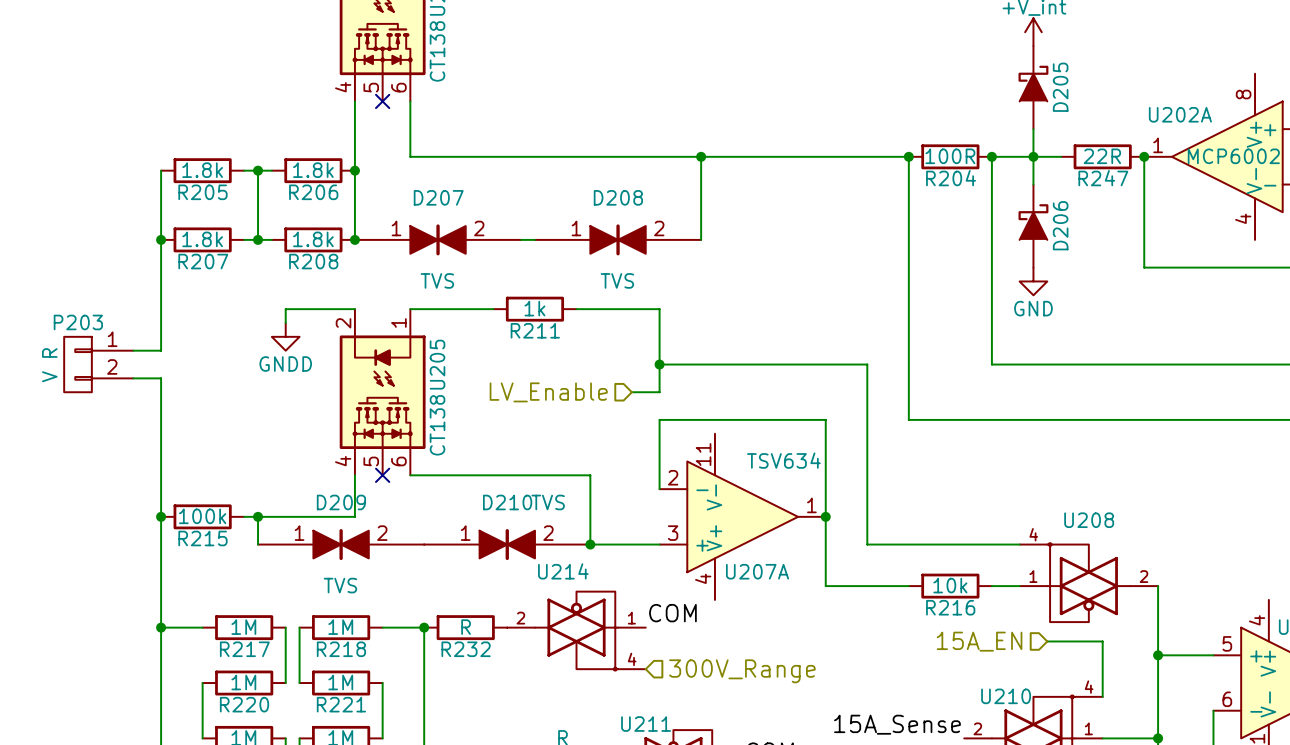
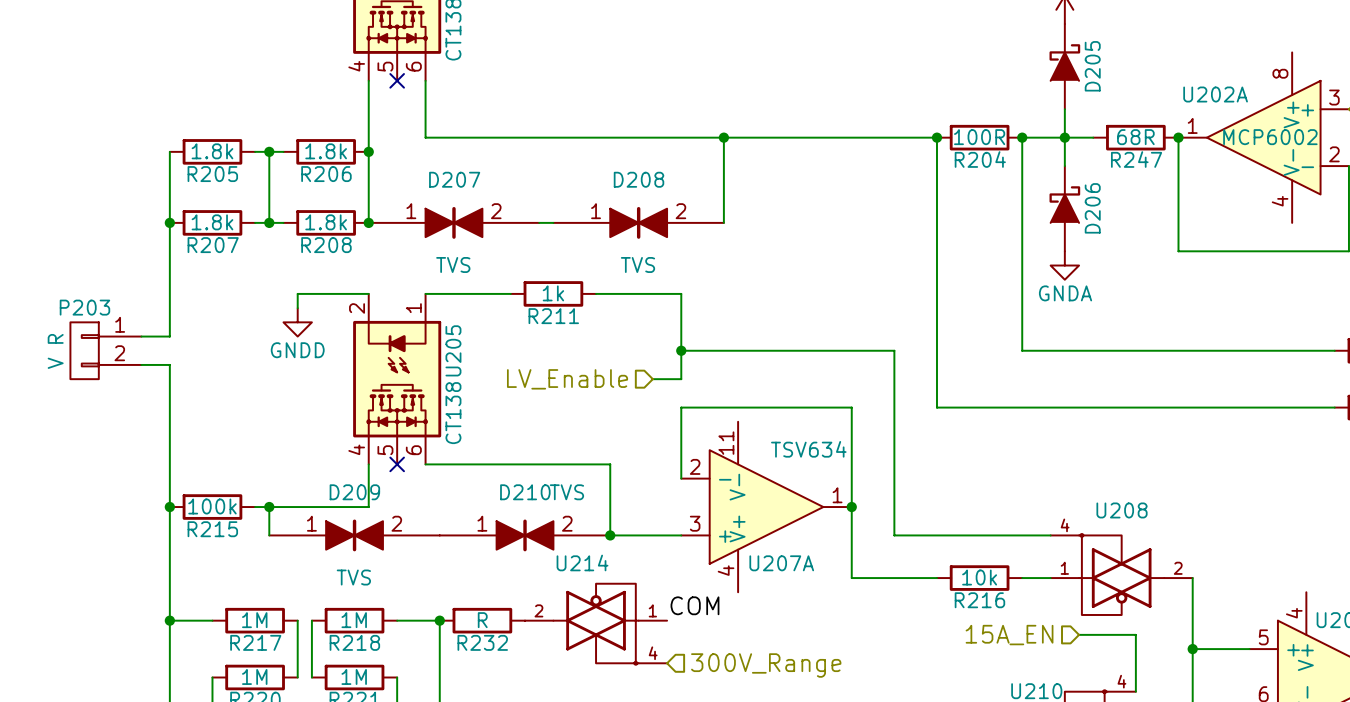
R247 value: 22R (1102, 156) -> 68R (1135, 137)
power symbol: GND (1033, 281) -> GNDA (1064, 265)

